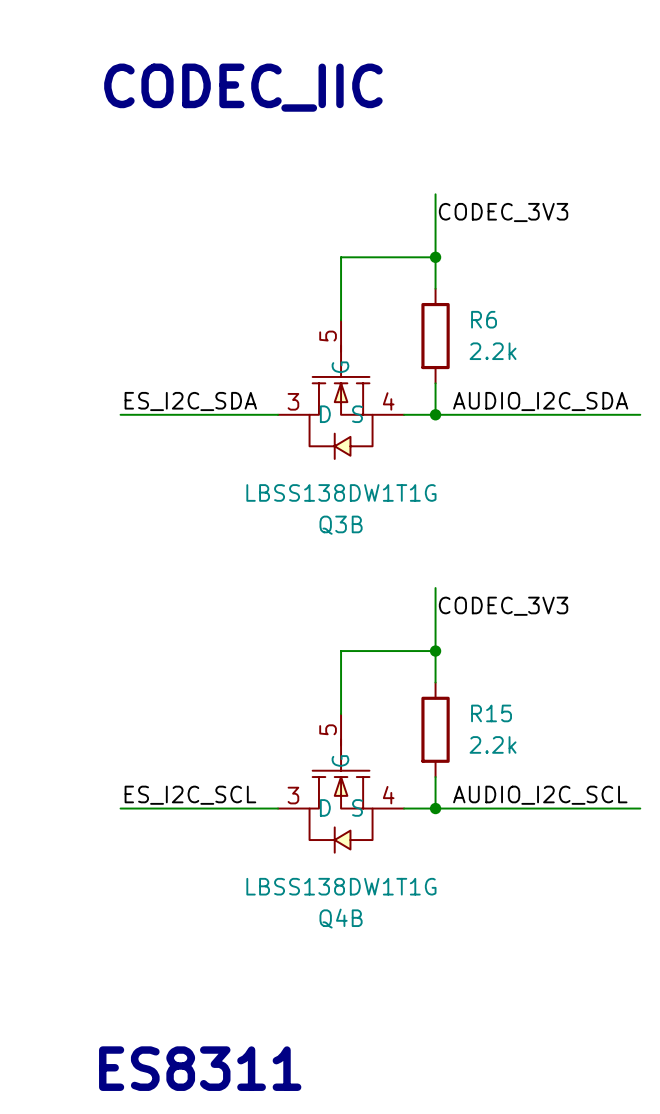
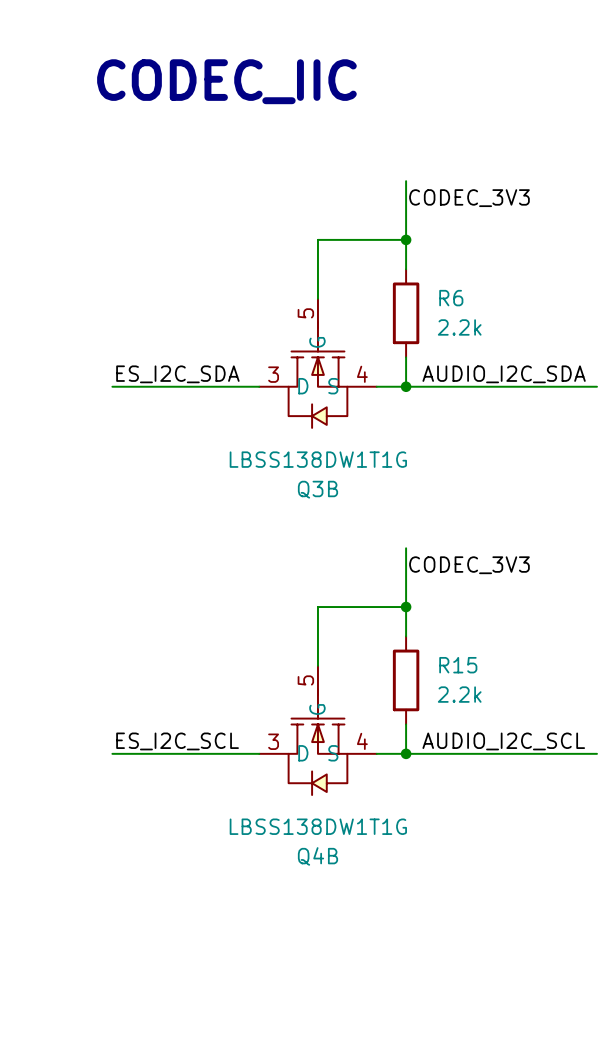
text: ES8311 (200, 1068) -> none

